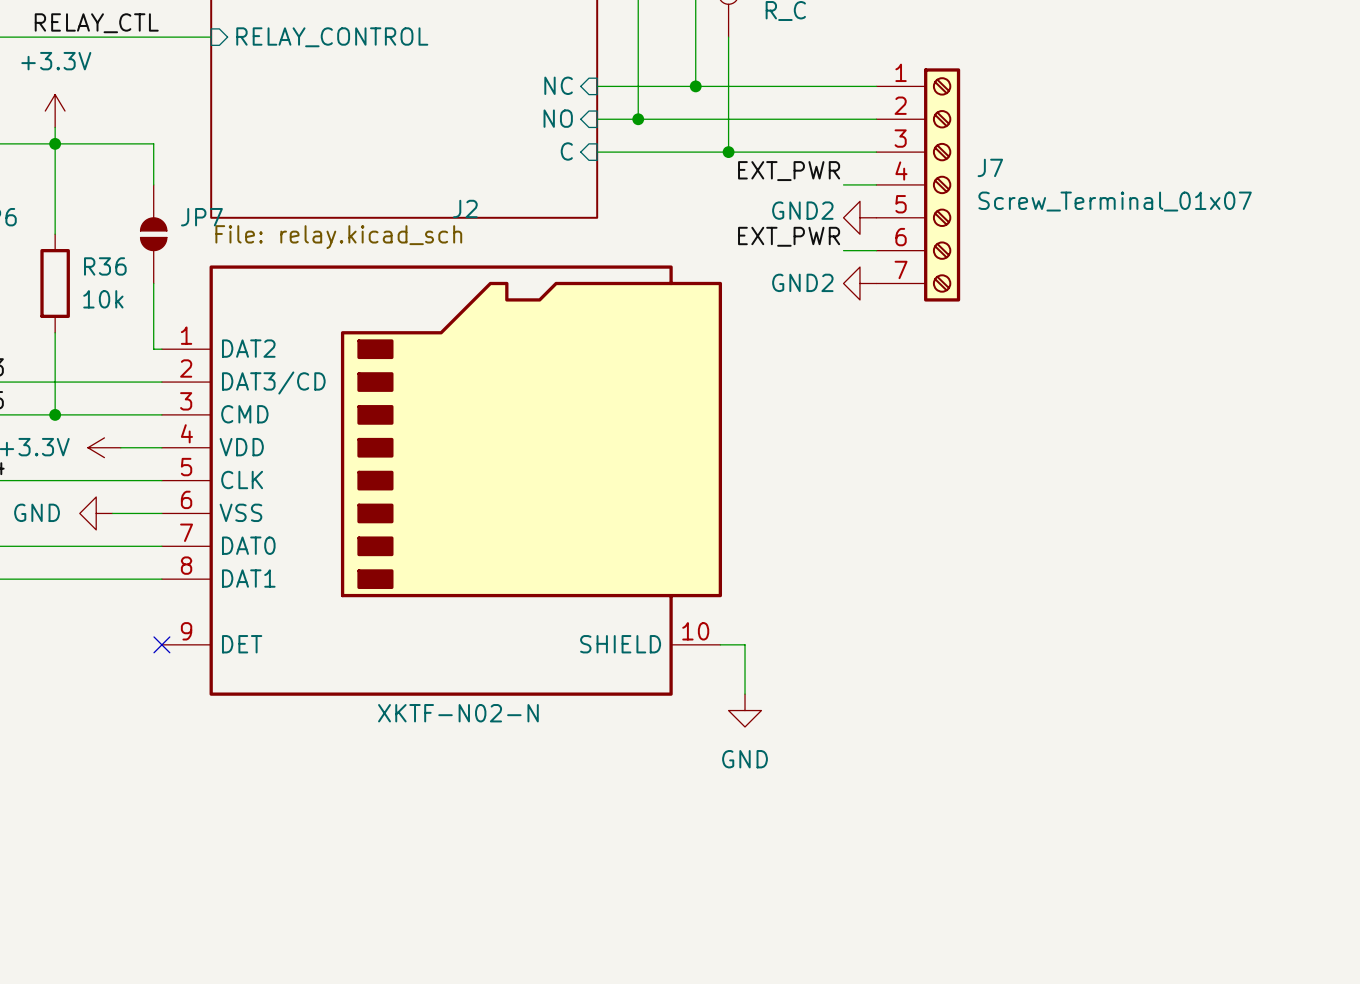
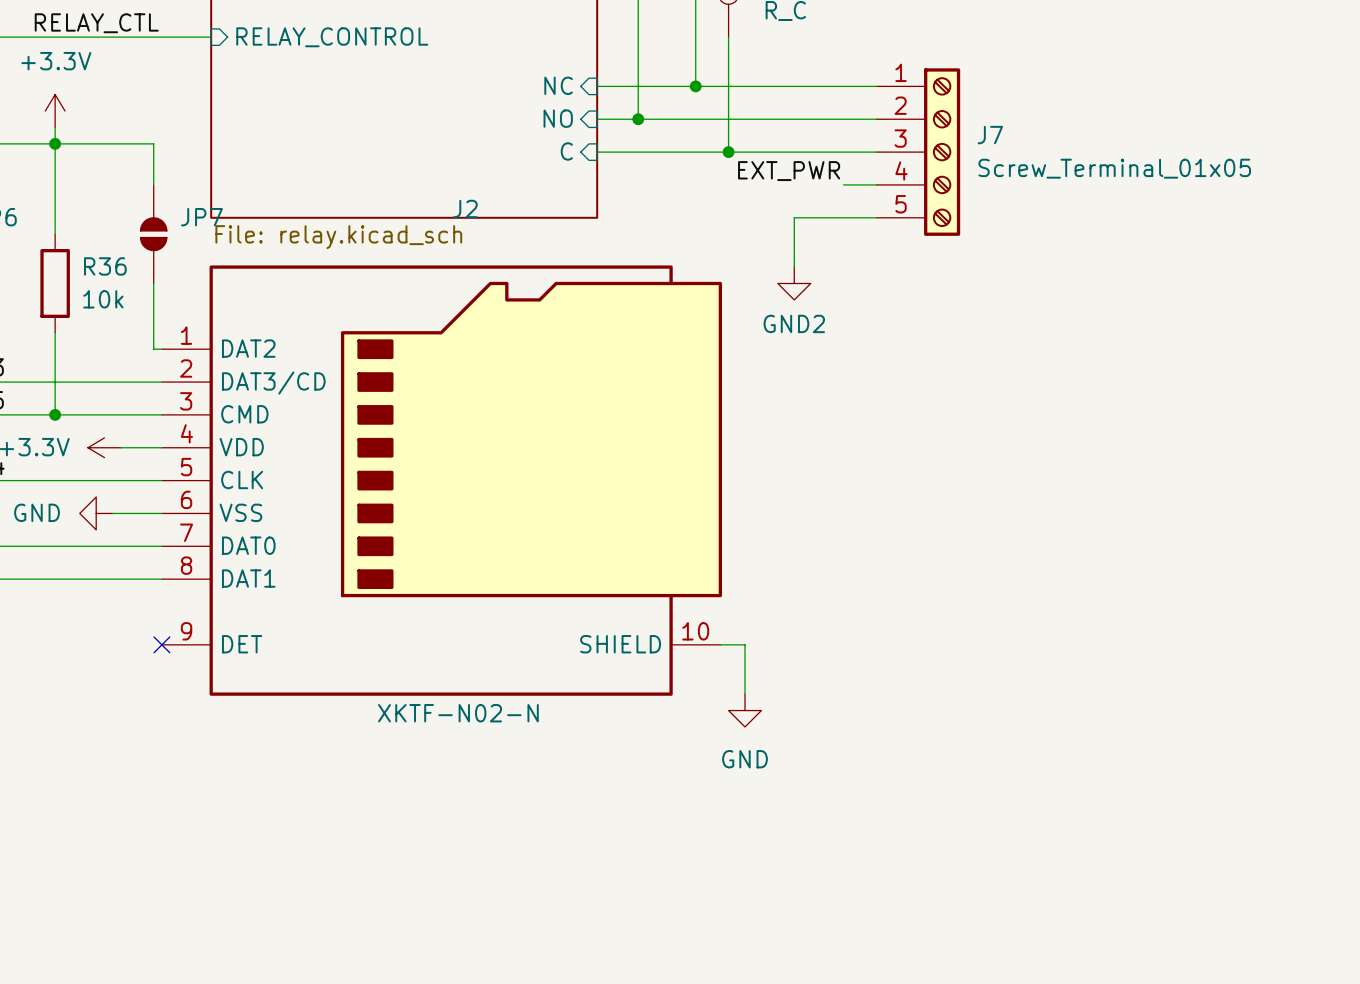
J7 symbol: [876, 68, 961, 302] -> [876, 68, 961, 236]
J7 value: Screw_Terminal_01x07 (1115, 201) -> Screw_Terminal_01x05 (1114, 168)
power symbol: GND2 (859, 217) -> none
wire: none -> (876, 217) (794, 217) (794, 267)
label: EXT_PWR (789, 236) -> none
wire: (843, 250) (876, 250) -> none
power symbol: none -> GND2 (794, 283)
power symbol: GND2 (859, 283) -> none

